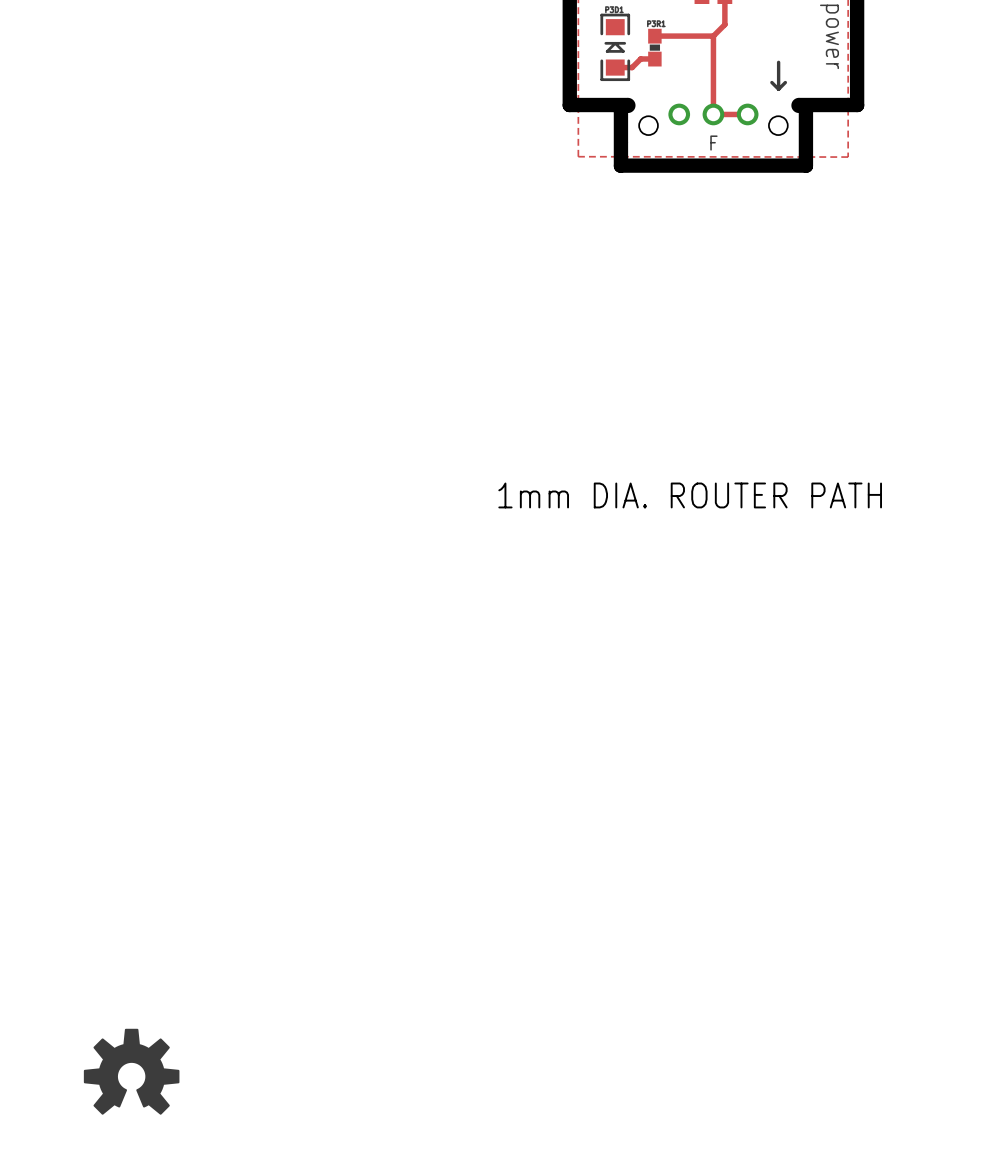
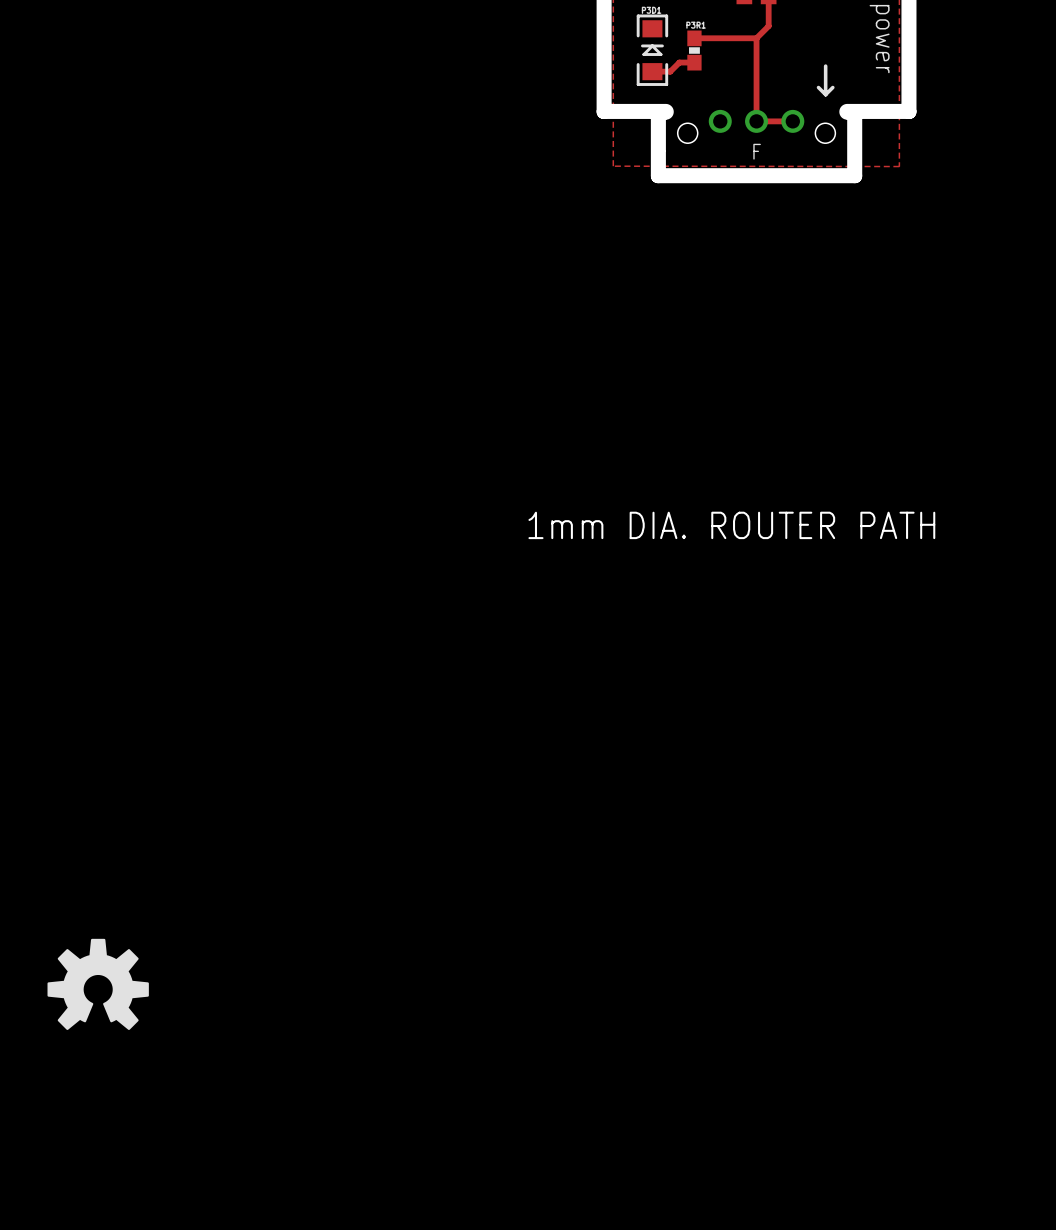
drawing position: (131, 1071) -> (98, 984)

